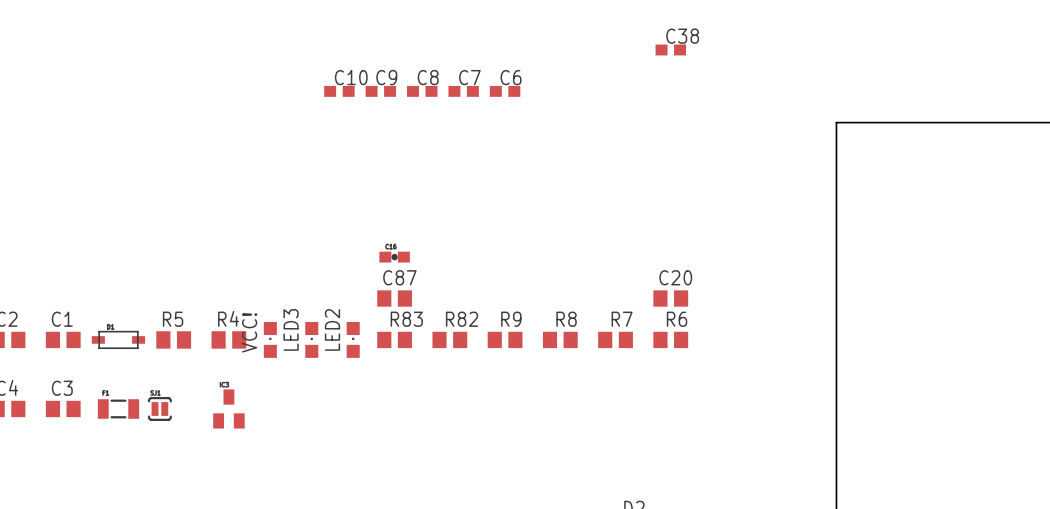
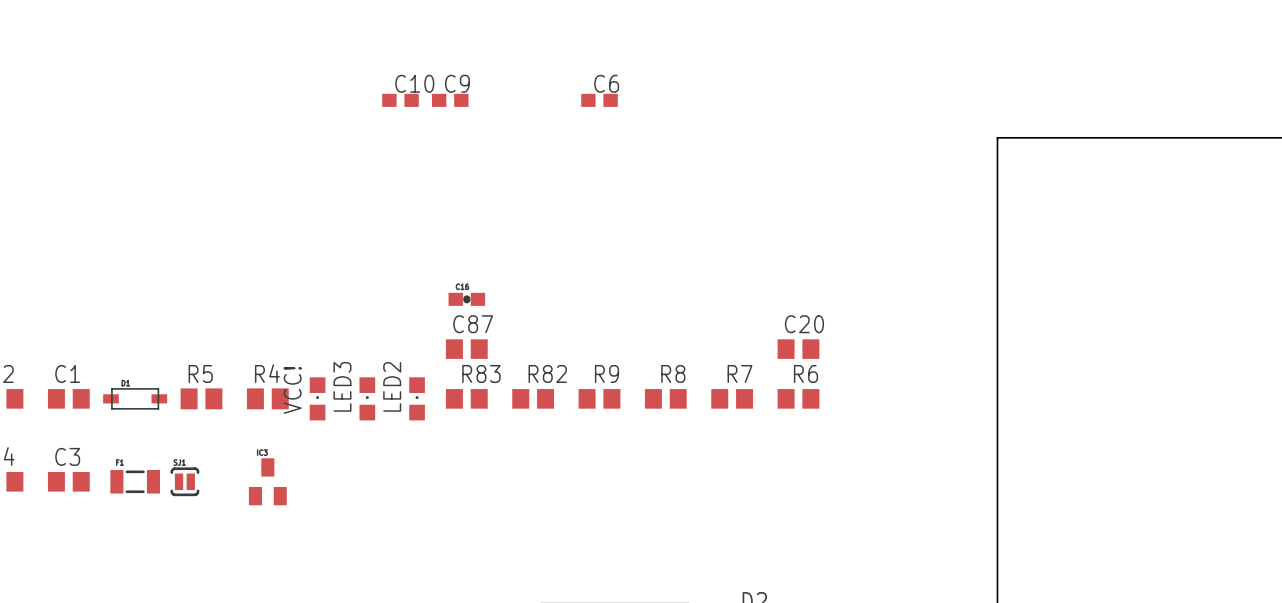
C38: (670, 49) -> none
C8: (422, 91) -> none
C7: (463, 91) -> none

